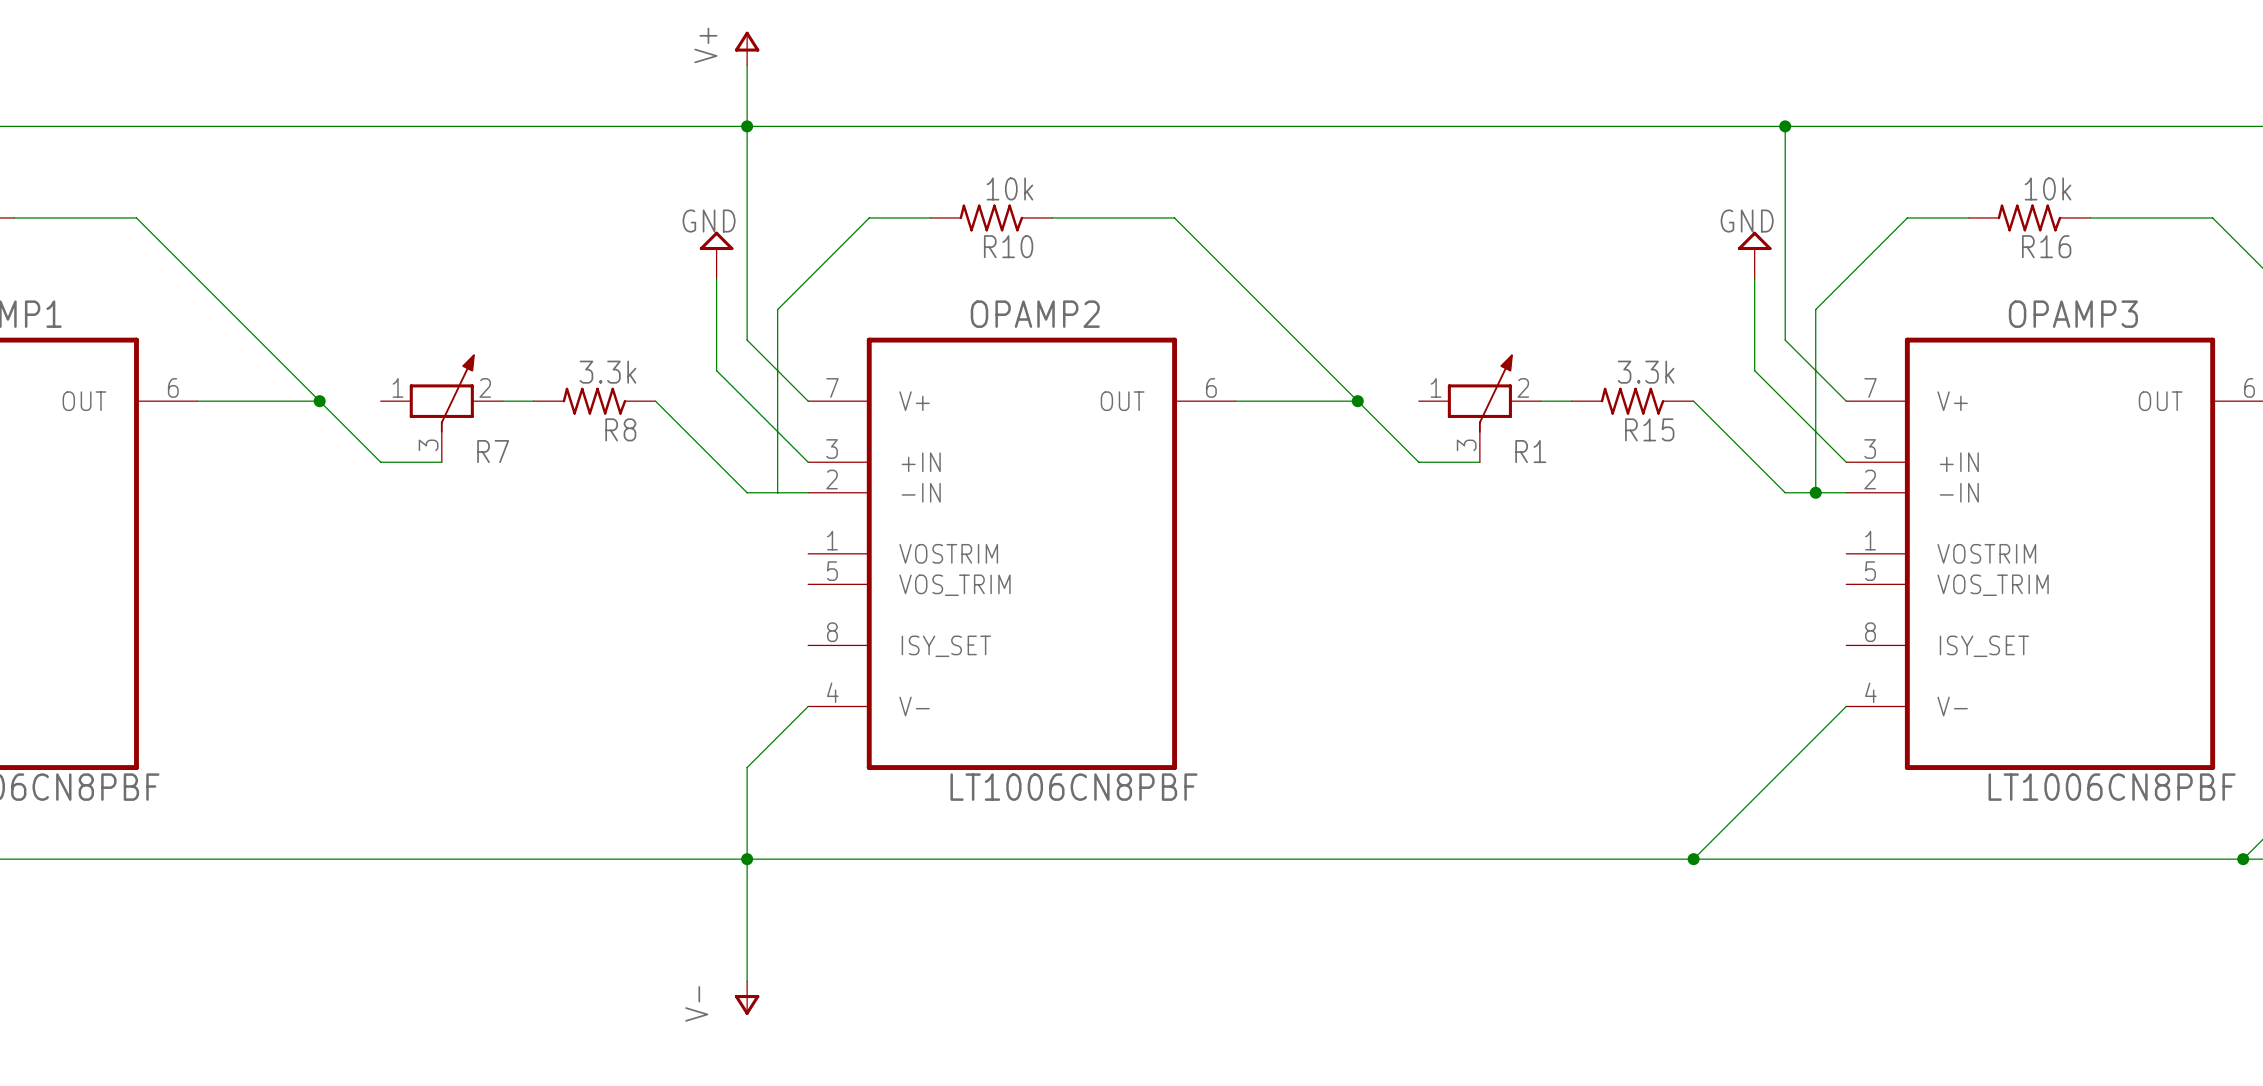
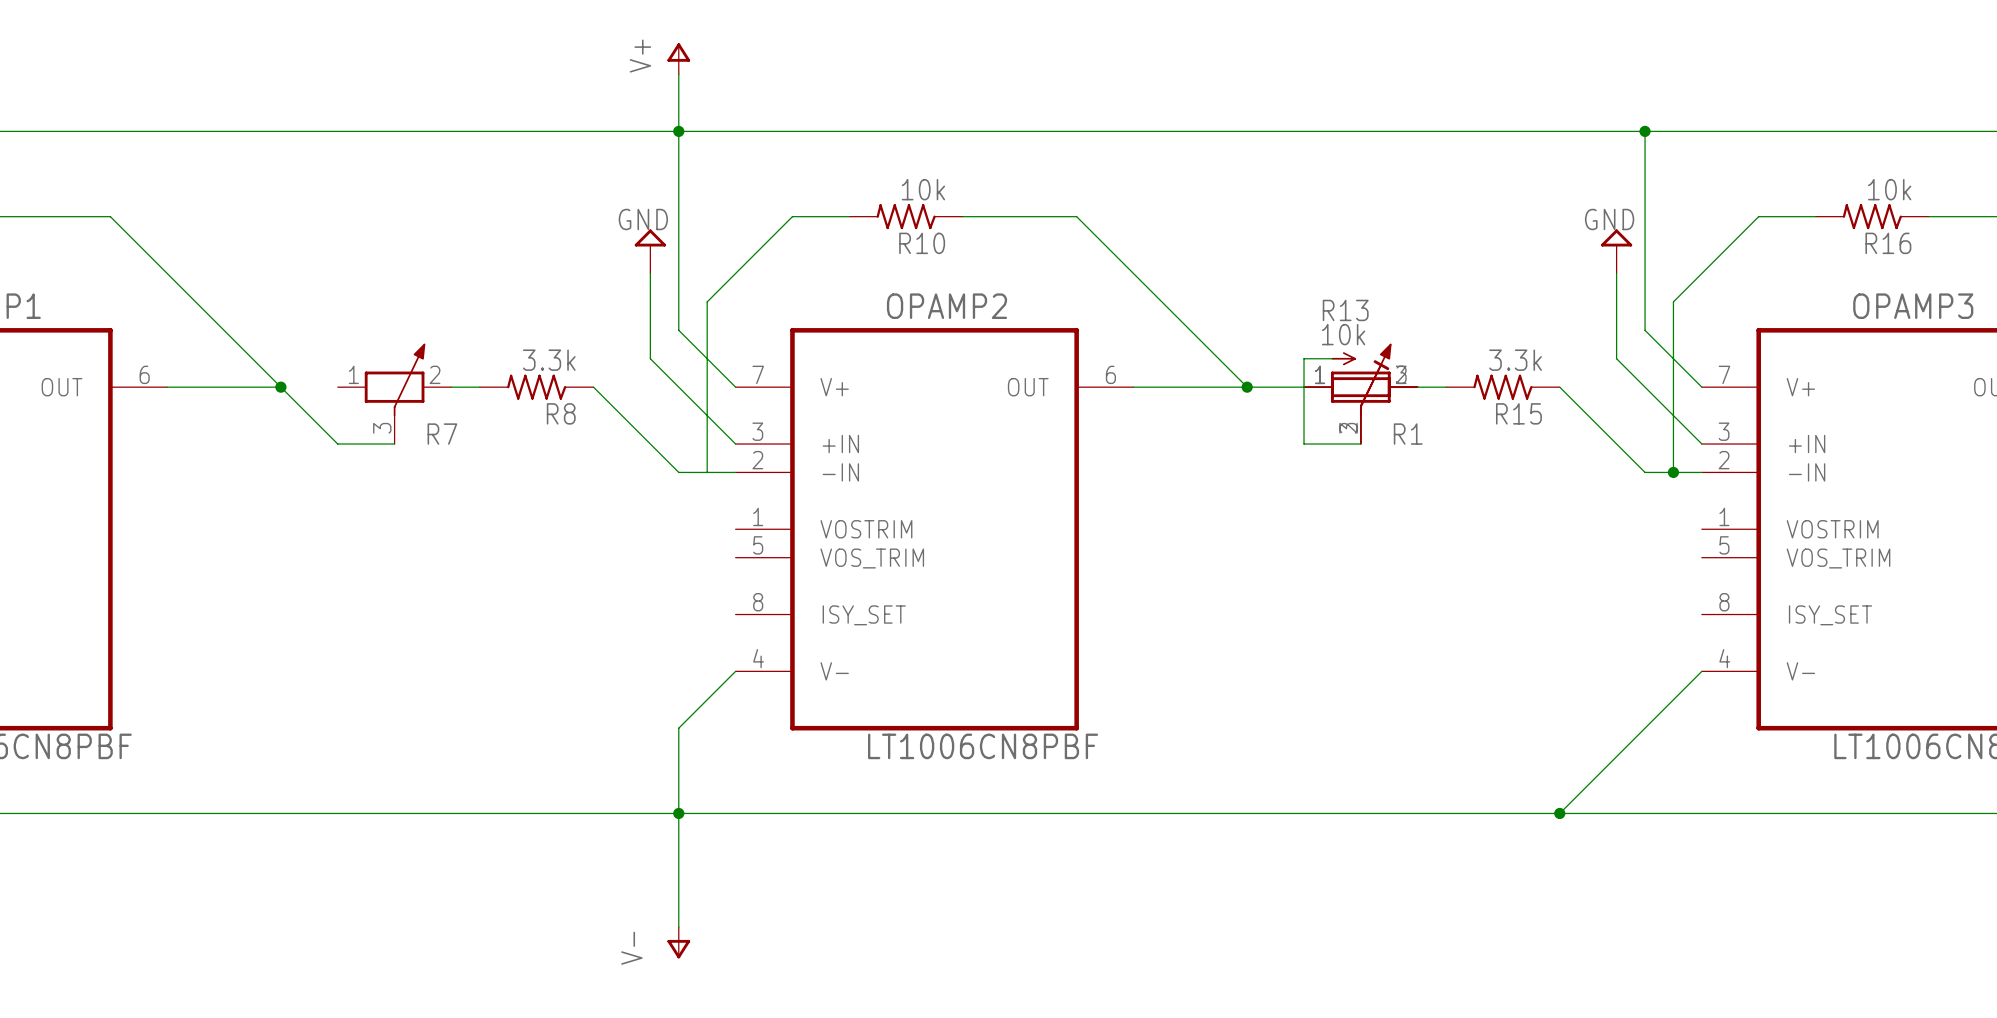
wire: none -> (1332, 358) (1304, 358) (1304, 444)
wire: (1357, 401) (1418, 462) -> (1247, 387) (1304, 387)
R13: none -> 10k (1361, 398)

